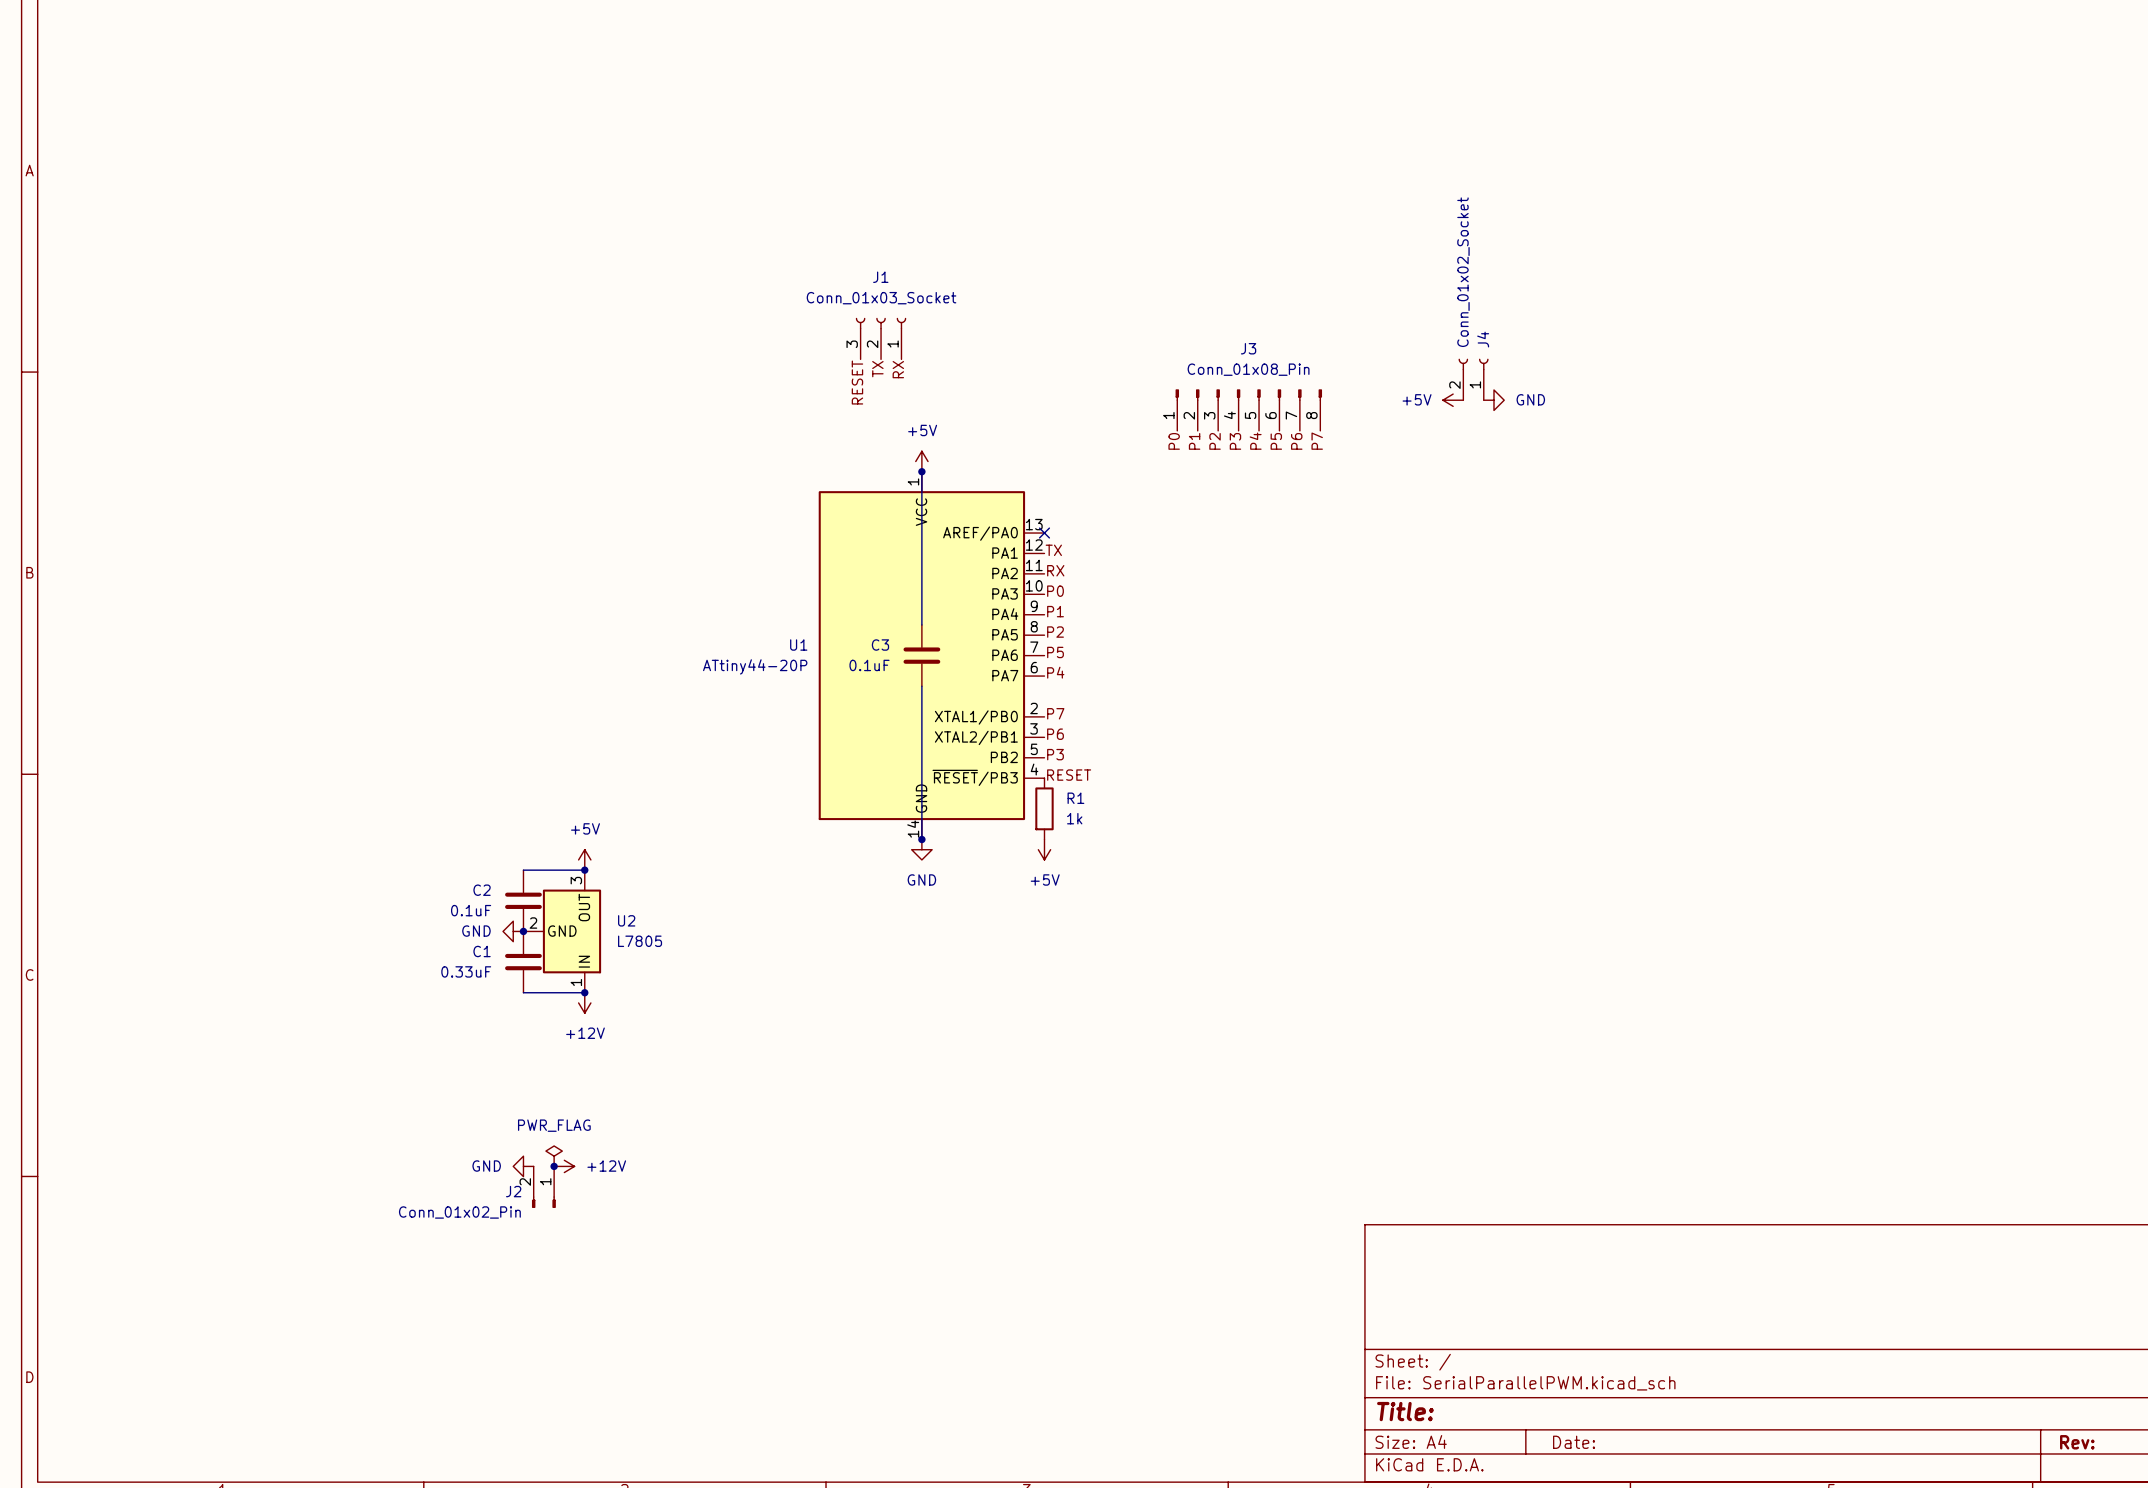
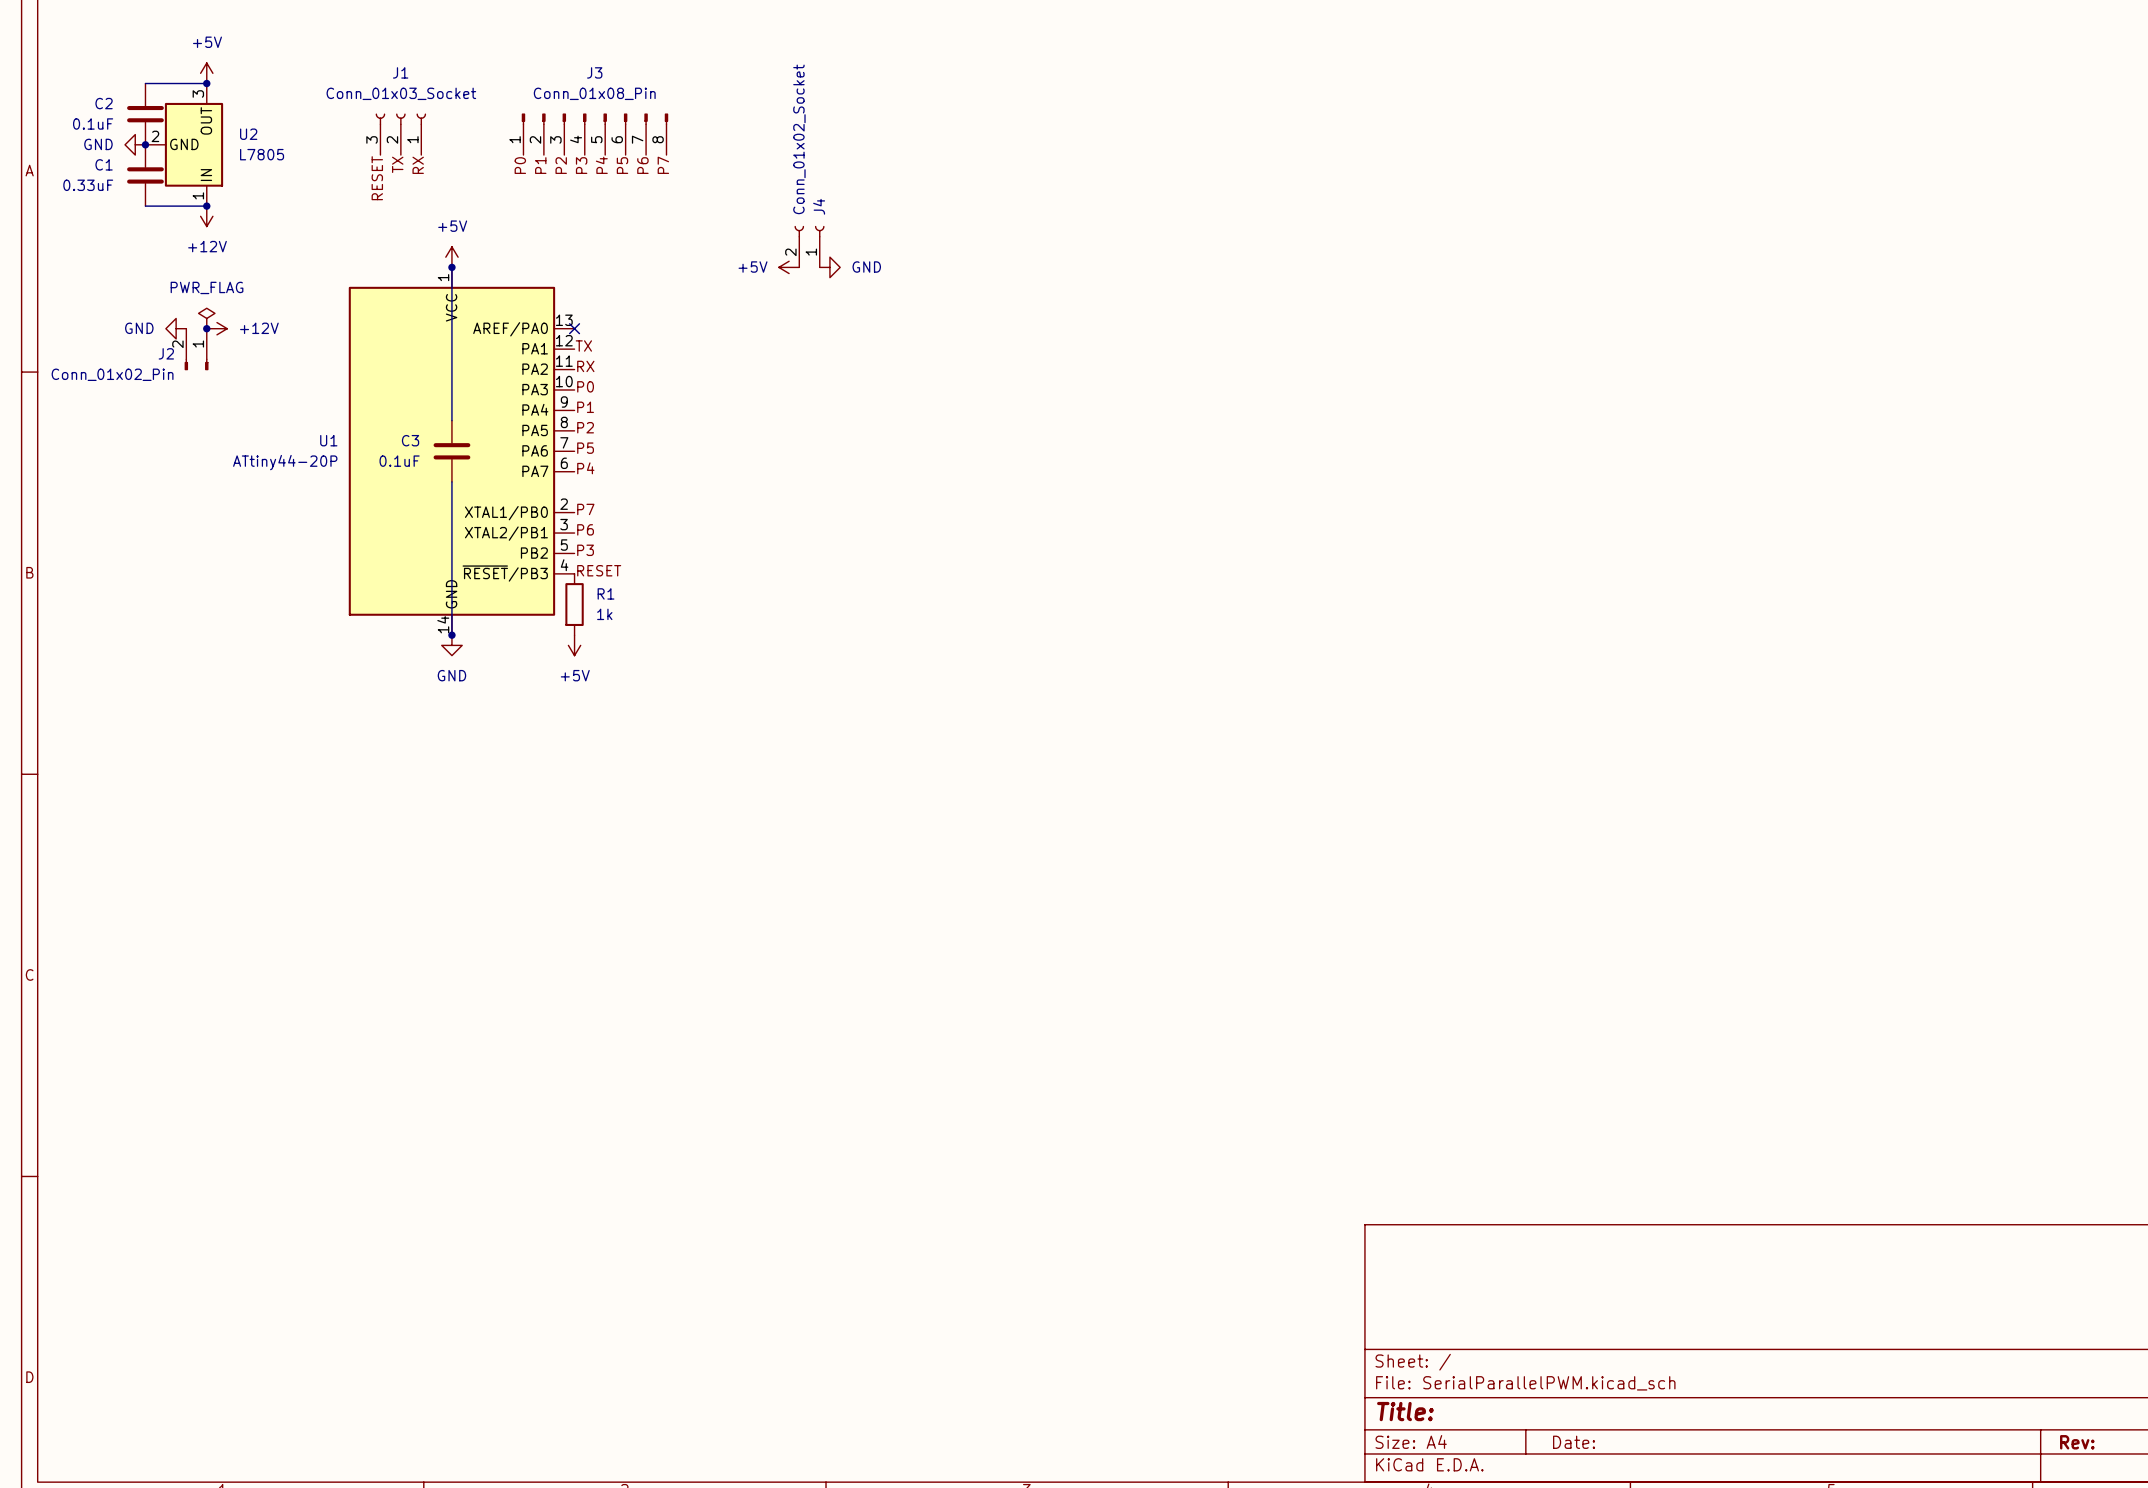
power symbol: none -> +5V (206, 73)
wire: none -> (145, 83) (206, 83)
junction: none -> (206, 83)
power symbol: none -> GND (135, 144)
junction: none -> (145, 144)
label: none -> TX (397, 164)
label: none -> RX (418, 165)
label: none -> P0 (520, 165)
label: none -> P1 (540, 165)
label: none -> P2 (561, 165)
label: none -> P3 (581, 165)
label: none -> P4 (601, 165)
label: none -> P5 (622, 165)
label: none -> P6 (642, 165)
label: none -> P7 (663, 165)
label: none -> RESET (377, 178)
wire: none -> (145, 206) (206, 206)
junction: none -> (206, 206)
power symbol: none -> +12V (206, 216)
power symbol: none -> +5V (451, 257)
wire: none -> (451, 267) (451, 420)
junction: none -> (451, 267)
power symbol: none -> +5V (789, 267)
power symbol: none -> GND (829, 267)
power symbol: none -> PWR_FLAG (206, 318)
power symbol: none -> GND (176, 328)
junction: none -> (206, 328)
power symbol: none -> +12V (216, 328)
no-connect mark: none -> (574, 328)
J1 position: (881, 338) -> (400, 134)
label: none -> TX (583, 345)
label: none -> RX (585, 366)
label: TX (877, 369) -> none
label: RX (898, 369) -> none
J4 position: (1473, 379) -> (809, 246)
label: RESET (857, 382) -> none
label: none -> P0 (585, 386)
power symbol: +5V (1453, 400) -> none
power symbol: GND (1493, 400) -> none
label: none -> P1 (585, 407)
J3 position: (1248, 410) -> (594, 134)
label: none -> P2 (585, 427)
label: P0 (1174, 441) -> none
label: P1 (1194, 441) -> none
label: P2 (1215, 441) -> none
label: P3 (1235, 441) -> none
label: P4 (1255, 441) -> none
label: P5 (1276, 441) -> none
label: P6 (1296, 441) -> none
label: P7 (1317, 441) -> none
label: none -> P5 (585, 448)
power symbol: +5V (921, 461) -> none
label: none -> P4 (585, 468)
wire: (921, 471) (921, 624) -> none
junction: (921, 471) -> none
wire: none -> (451, 481) (451, 635)
label: none -> P7 (585, 509)
label: none -> P6 (585, 529)
no-connect mark: (1044, 533) -> none
label: none -> P3 (585, 550)
label: TX (1053, 550) -> none
label: none -> RESET (599, 570)
label: RX (1055, 570) -> none
label: P0 (1055, 591) -> none
label: P1 (1055, 611) -> none
label: P2 (1055, 632) -> none
junction: none -> (451, 635)
power symbol: none -> GND (451, 645)
power symbol: none -> +5V (574, 645)
label: P5 (1055, 652) -> none
C3 position: (921, 655) -> (451, 451)
U1 position: (931, 655) -> (461, 451)
label: P4 (1055, 672) -> none
wire: (921, 686) (921, 839) -> none
label: P7 (1055, 713) -> none
label: P6 (1055, 734) -> none
label: P3 (1055, 754) -> none
label: RESET (1069, 775) -> none
R1 position: (1044, 808) -> (574, 604)
junction: (921, 839) -> none
power symbol: GND (921, 849) -> none
power symbol: +5V (1044, 849) -> none
power symbol: +5V (584, 859) -> none
wire: (523, 870) (584, 870) -> none
junction: (584, 870) -> none
C2 position: (523, 900) -> (145, 114)
power symbol: GND (513, 931) -> none
junction: (523, 931) -> none
U2 position: (562, 931) -> (184, 144)
C1 position: (523, 962) -> (145, 175)
wire: (523, 992) (584, 992) -> none
junction: (584, 992) -> none
power symbol: +12V (584, 1002) -> none
power symbol: PWR_FLAG (554, 1156) -> none
power symbol: GND (523, 1166) -> none
junction: (554, 1166) -> none
power symbol: +12V (564, 1166) -> none
J2 position: (543, 1187) -> (196, 349)

